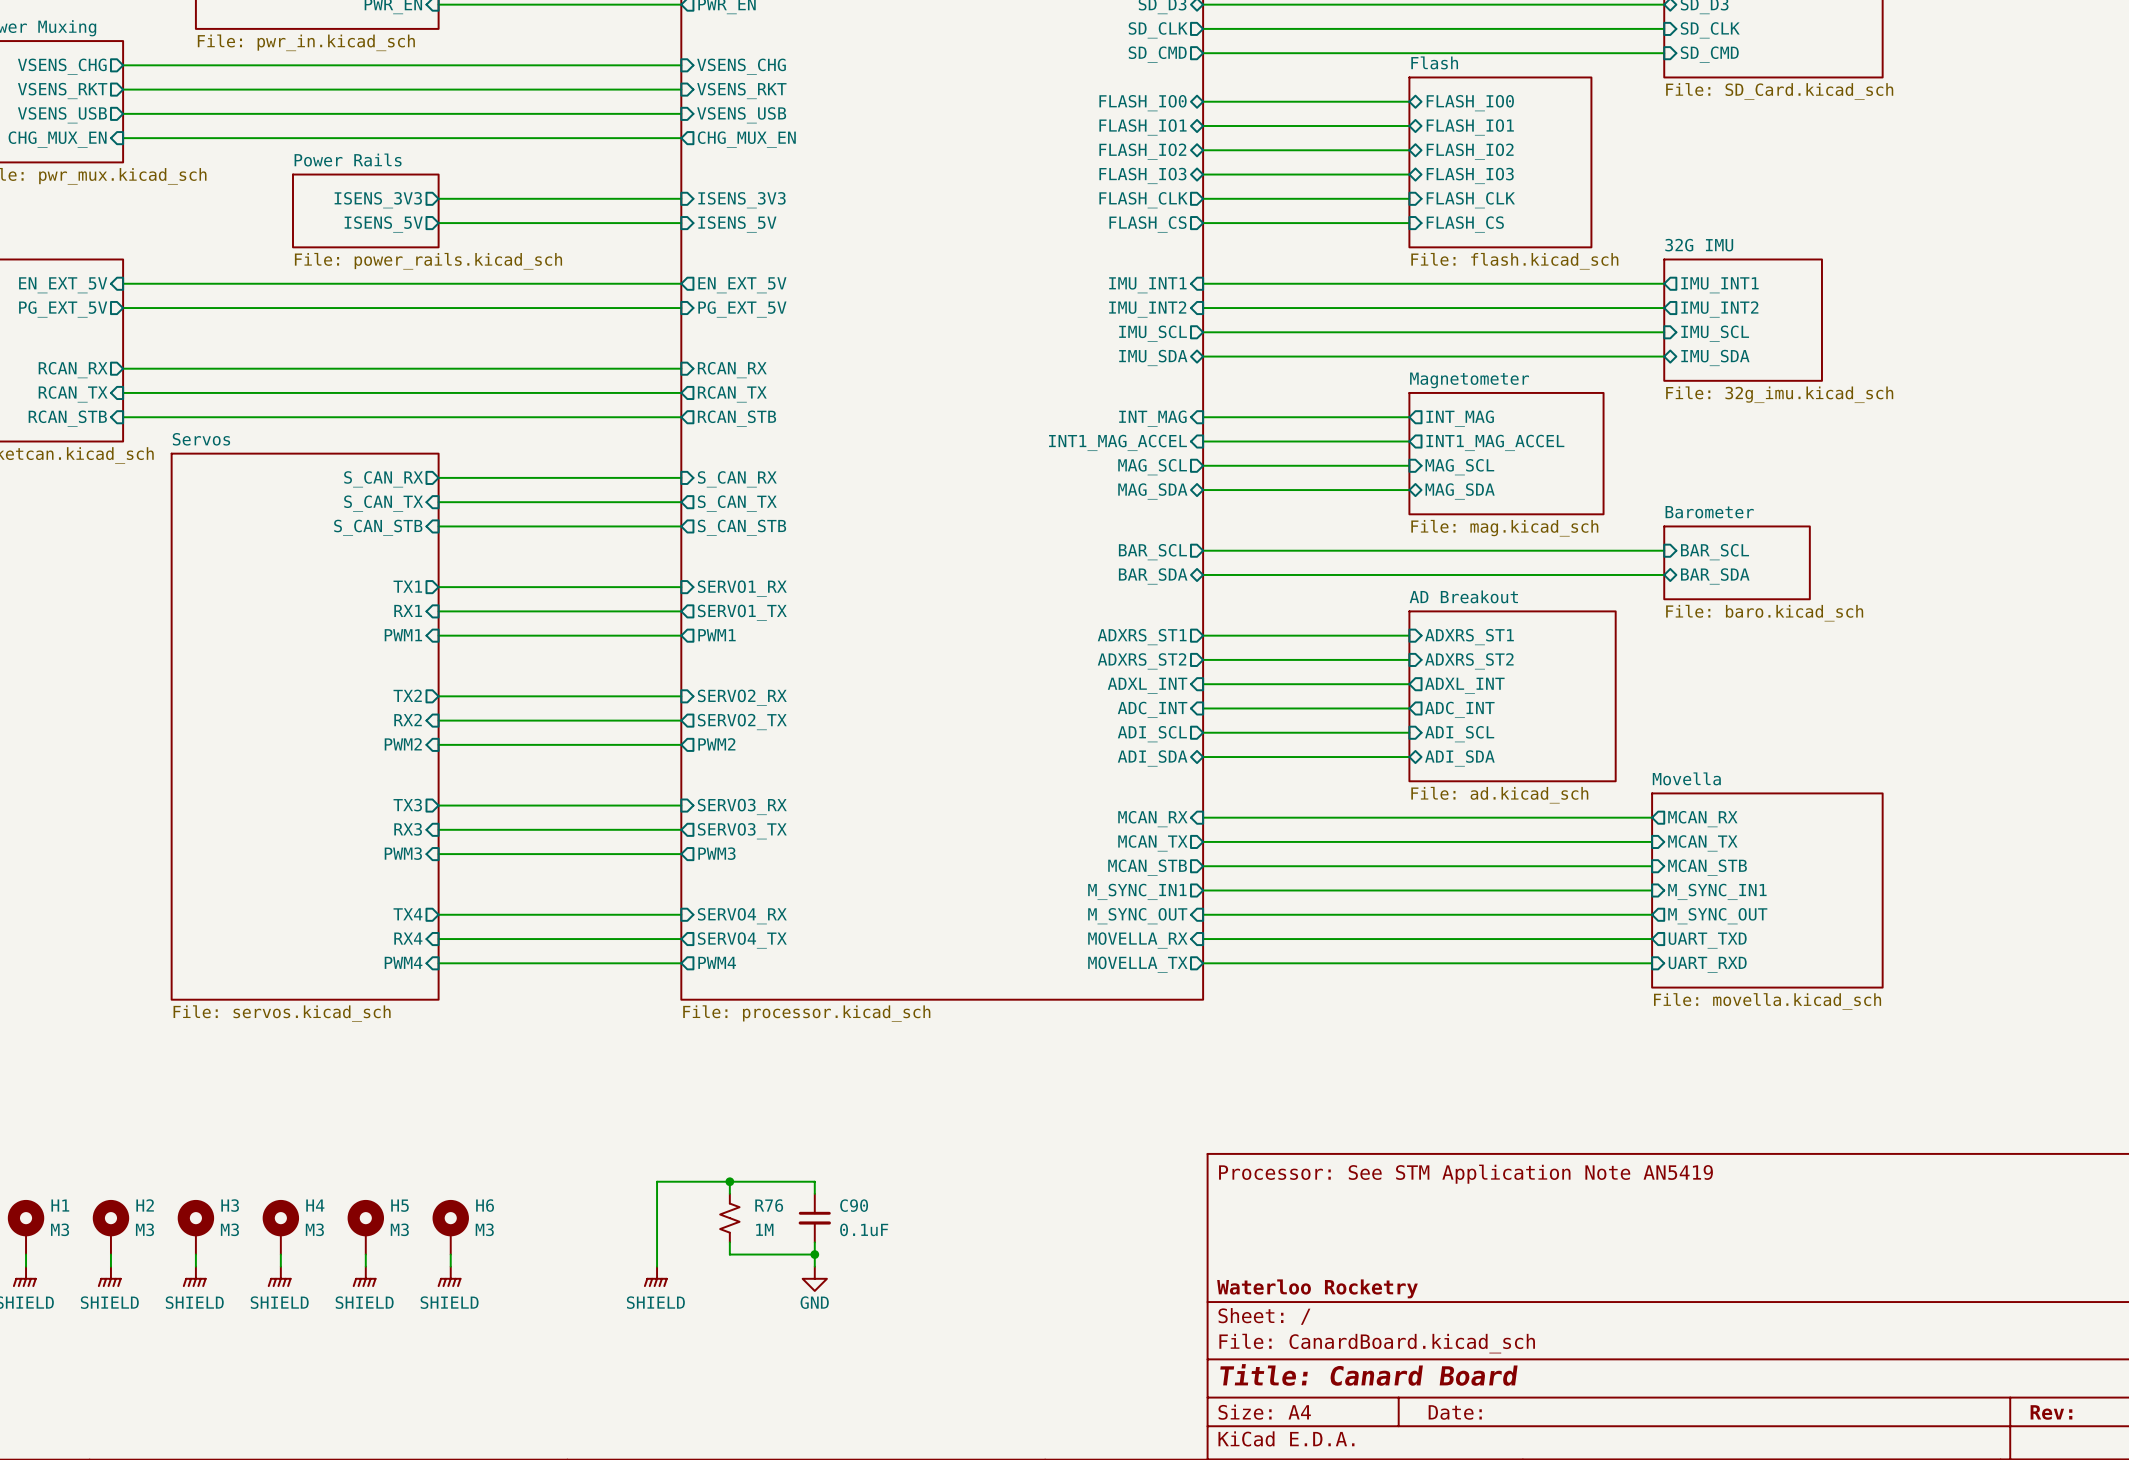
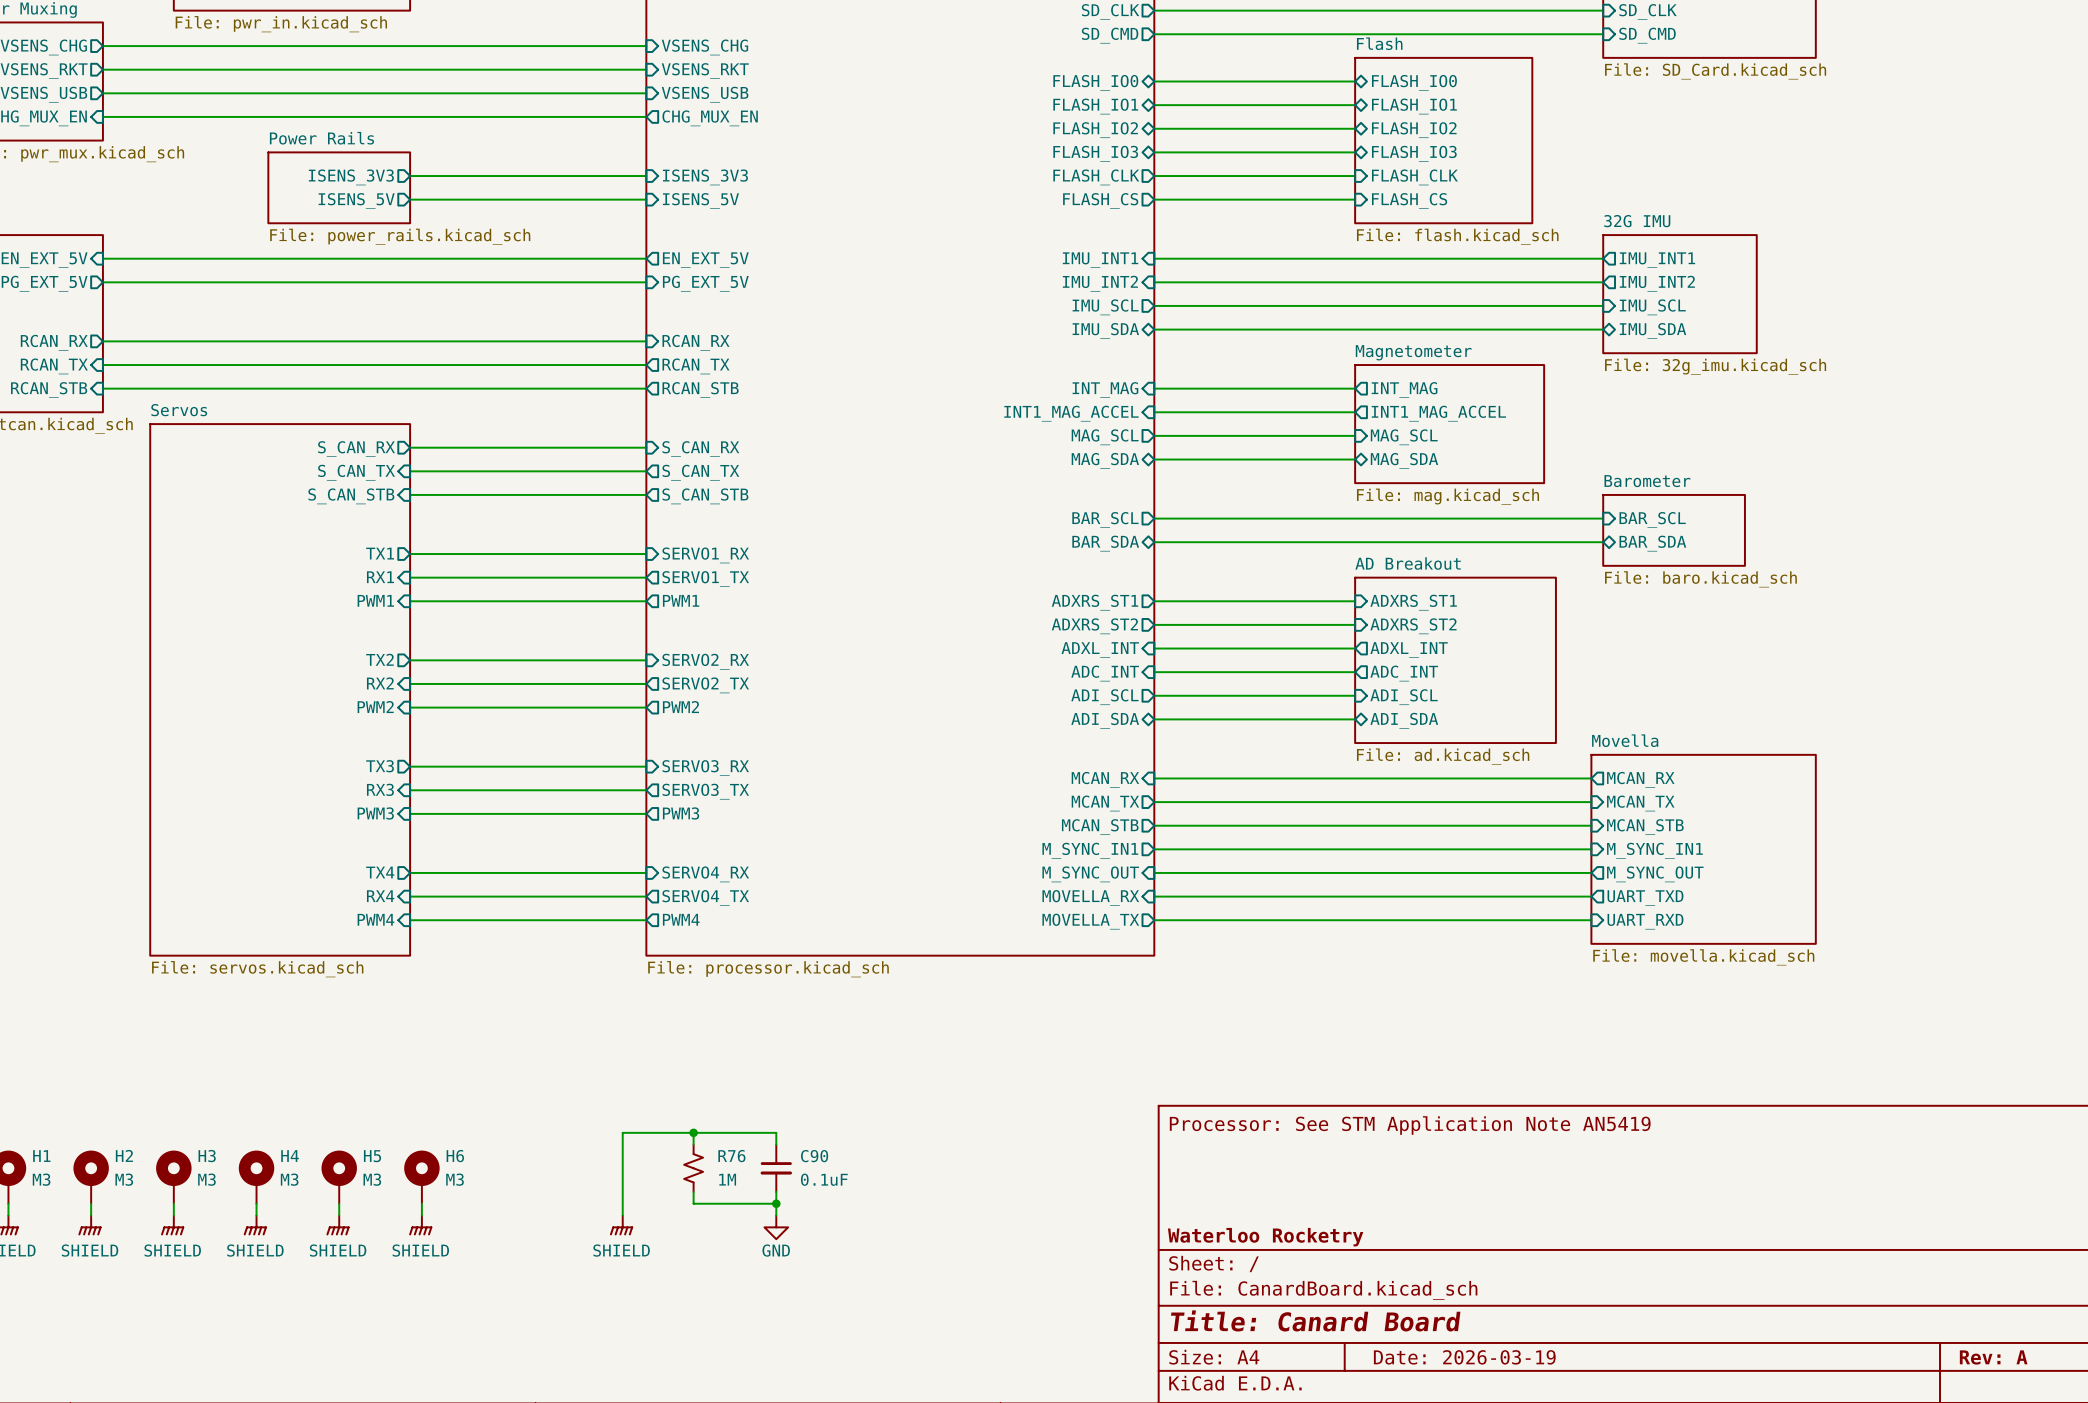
title block: Date: (1455, 1412) -> Date: 2026-03-19 (1464, 1357)
title block: Rev: (2051, 1412) -> Rev: A (1993, 1357)

